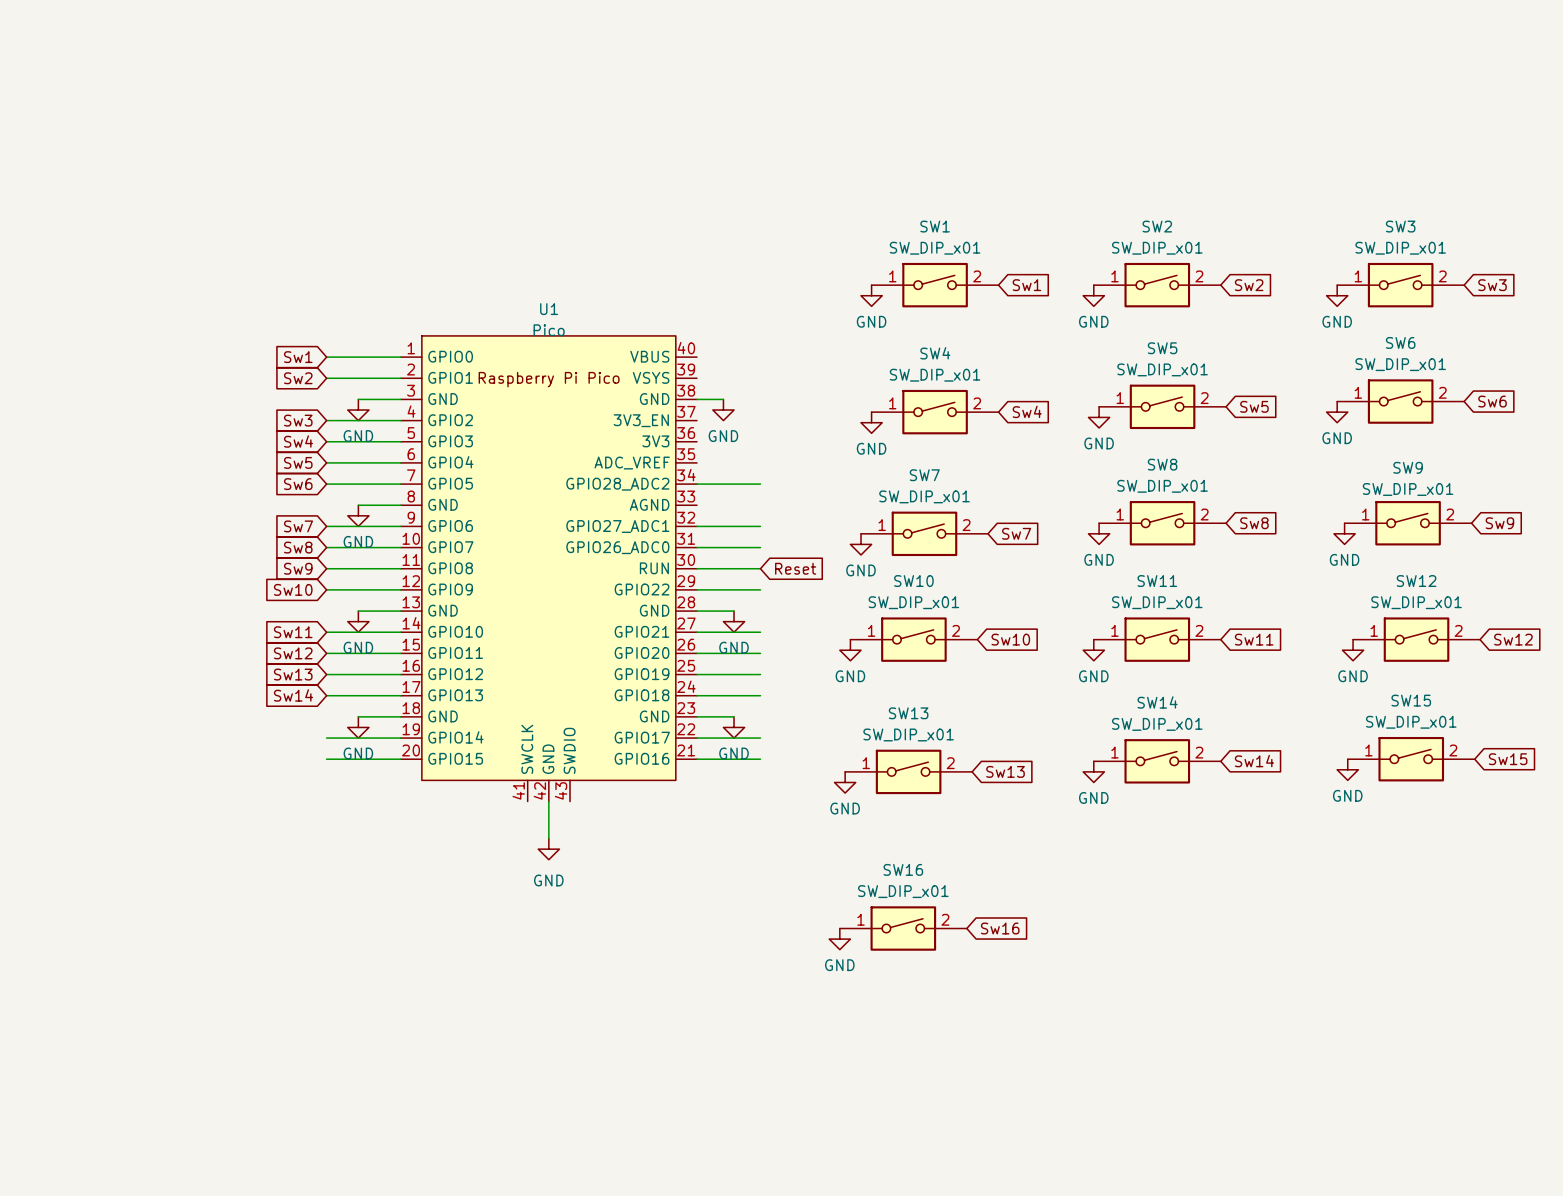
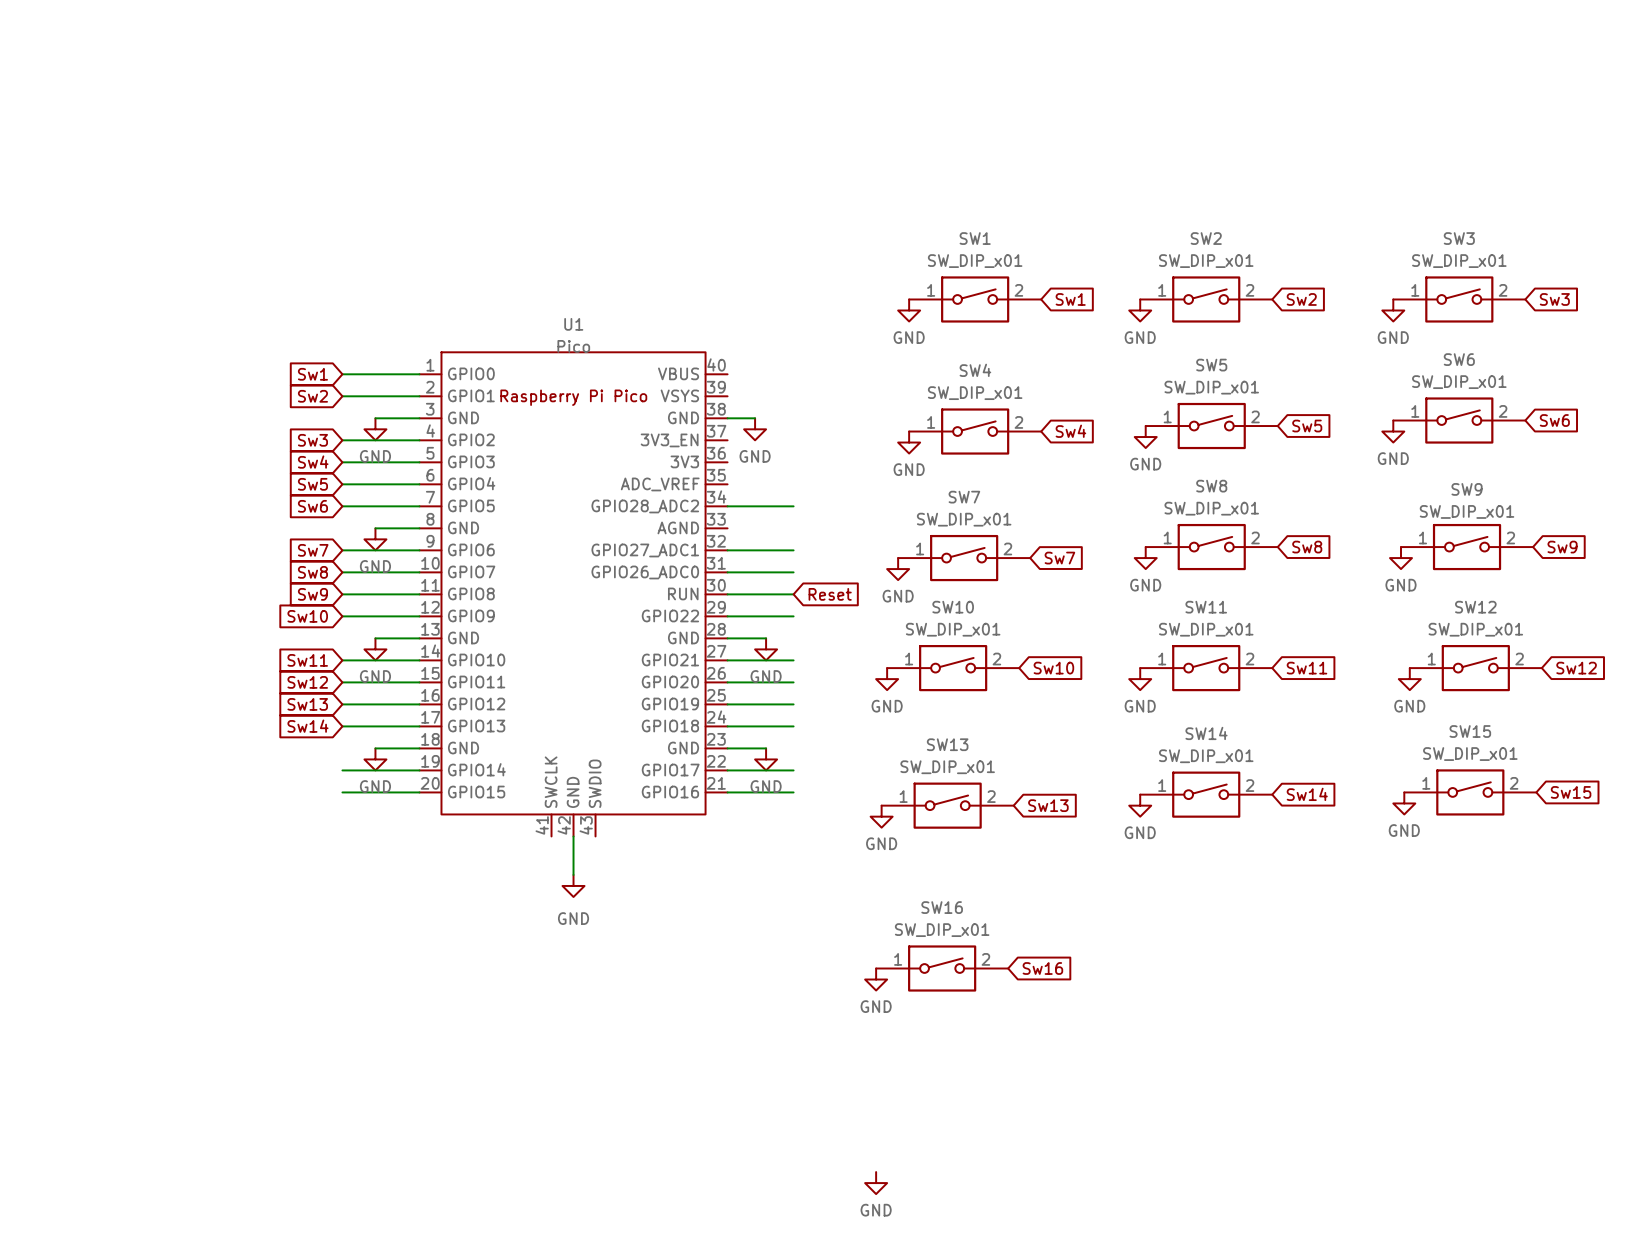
power symbol: none -> GND (876, 1183)

